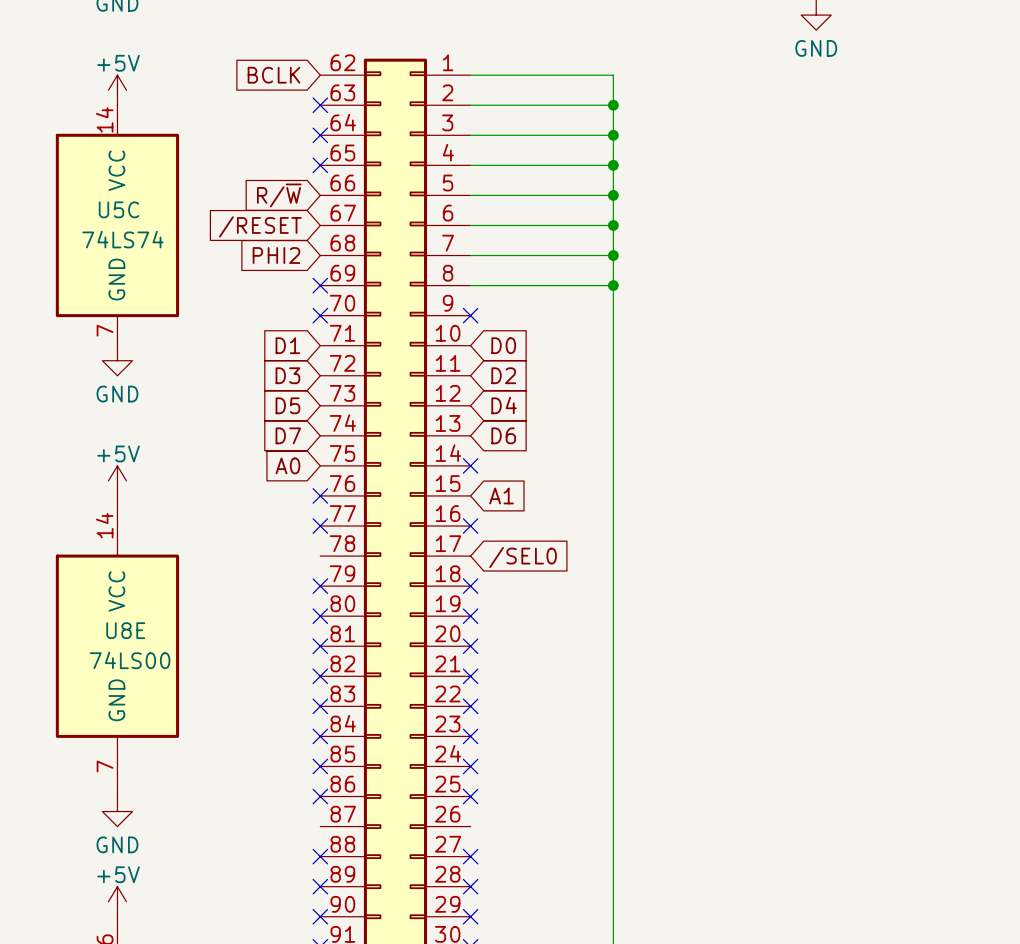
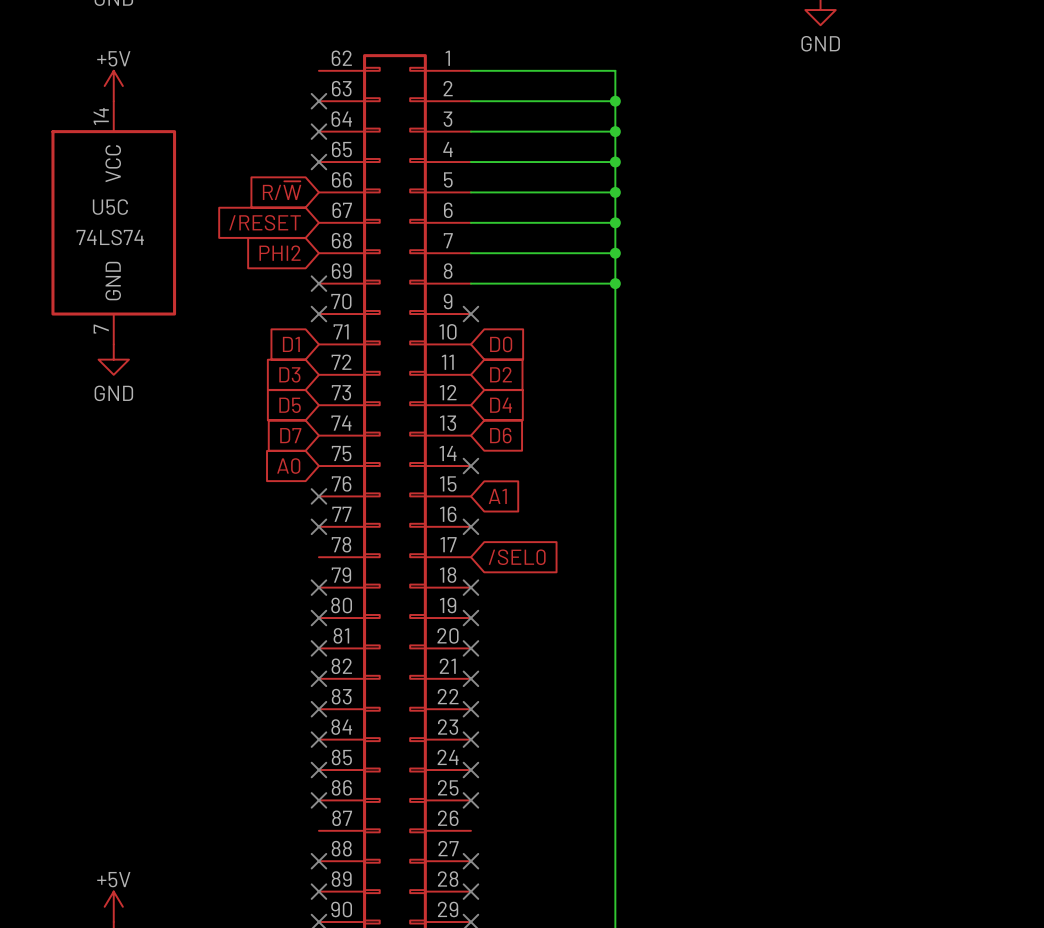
global label: BCLK (273, 75) -> none
power symbol: +5V (117, 480) -> none
U8E: 74LS00 (117, 646) -> none
power symbol: GND (117, 811) -> none

